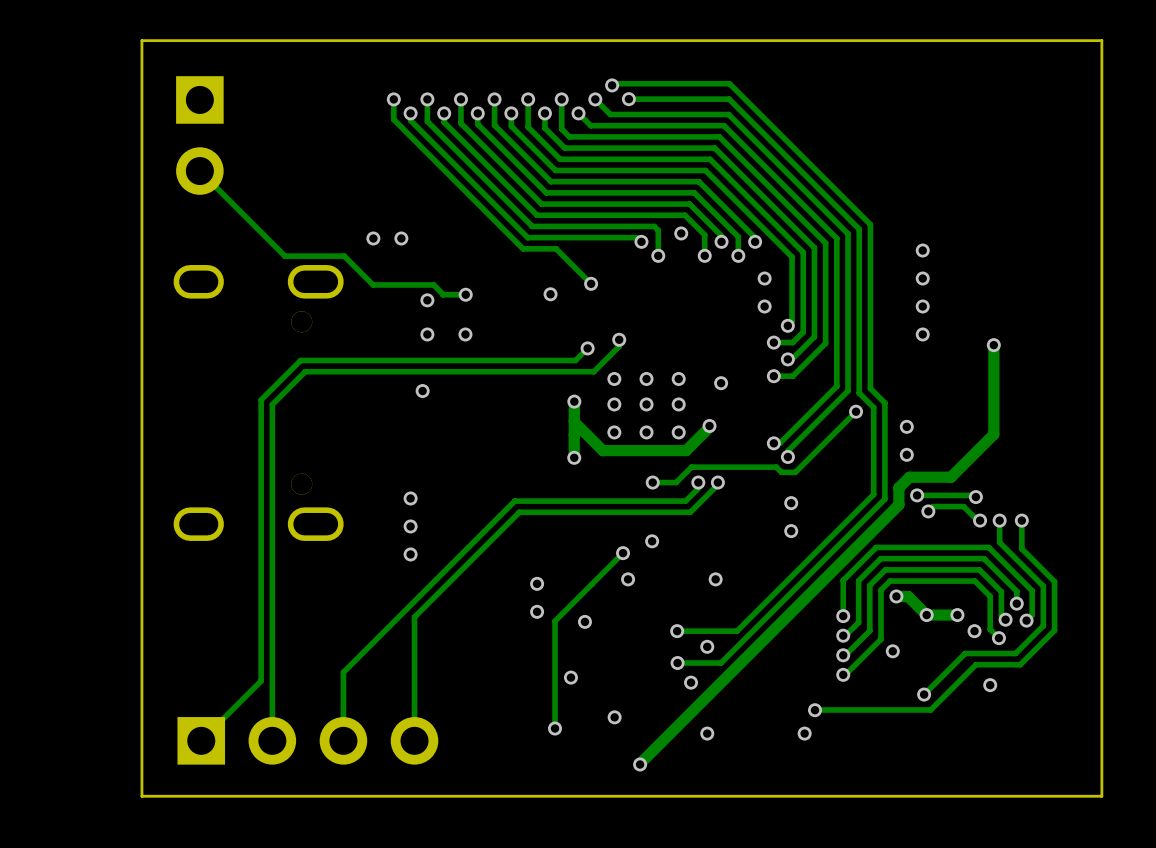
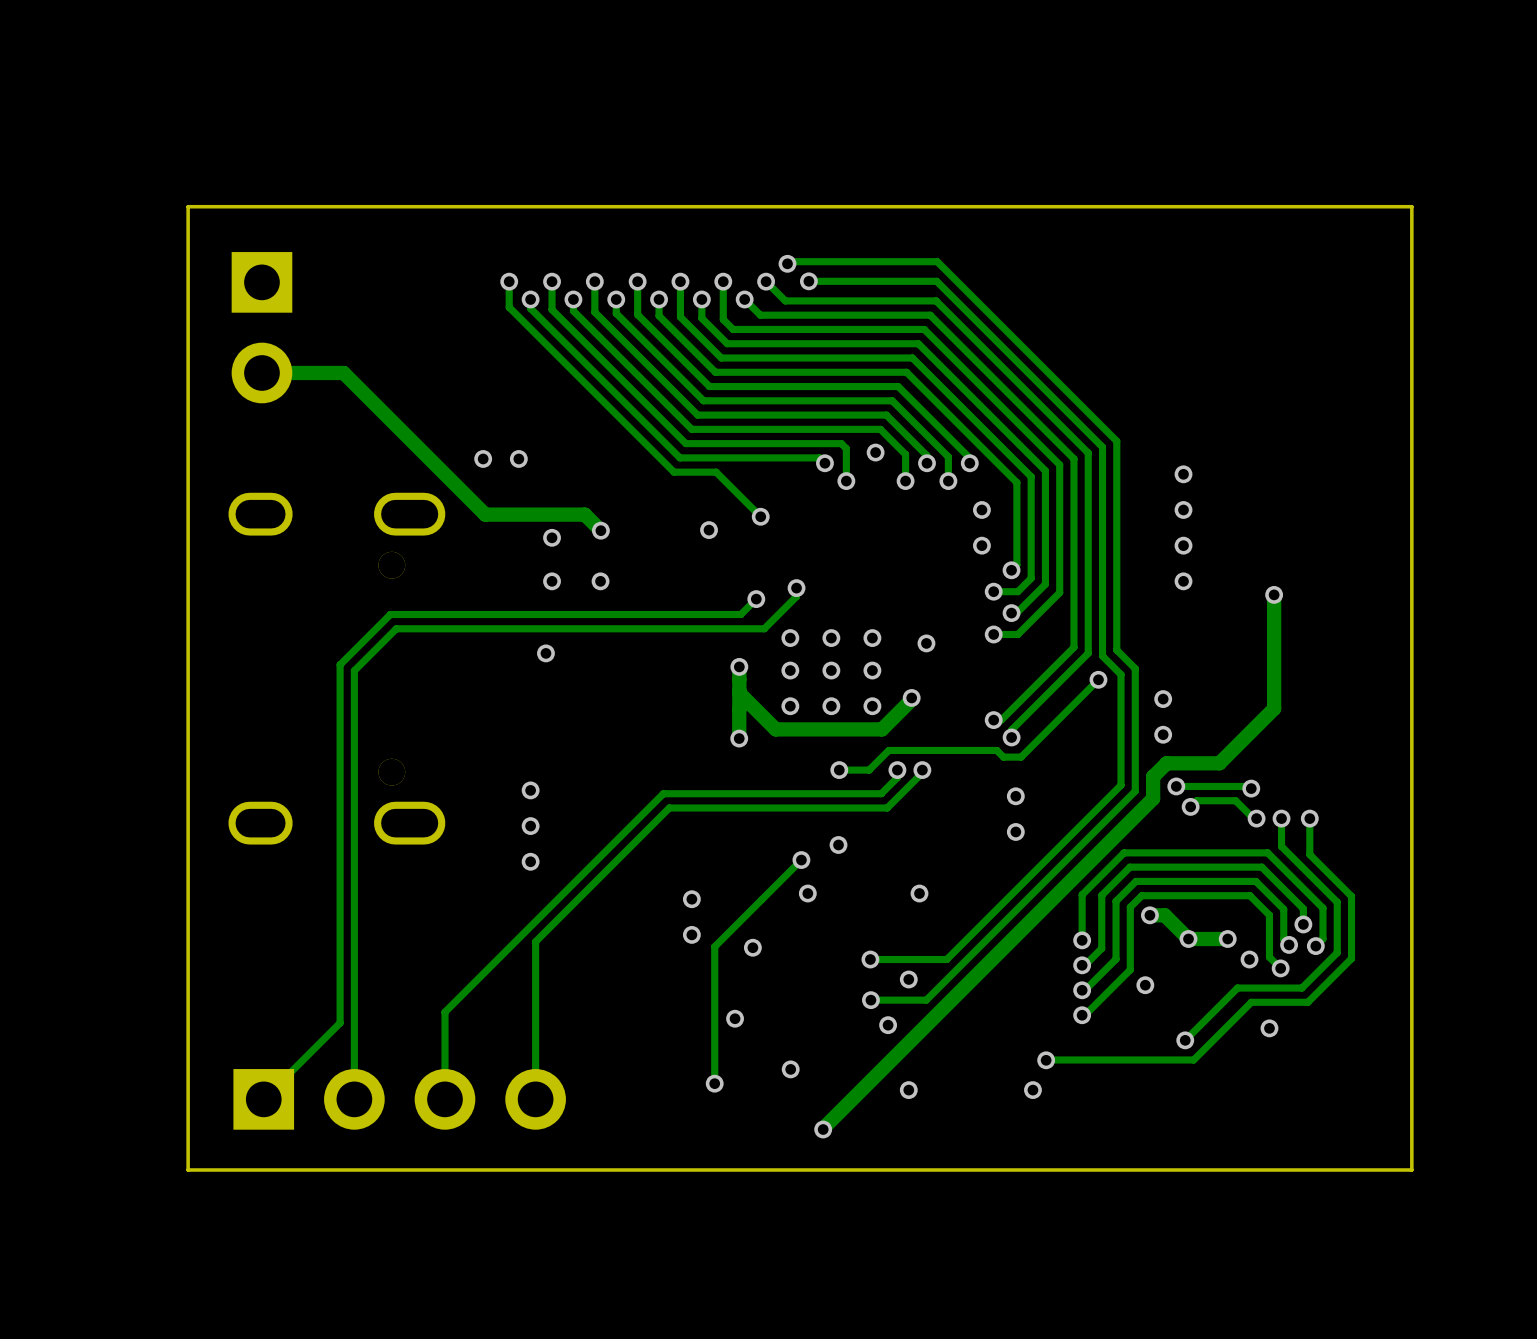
track: (199, 171) (284, 256) (344, 256) (373, 284) (433, 284) (442, 294) (465, 294) -> (261, 372) (343, 372) (485, 514) (584, 514) (600, 530)

